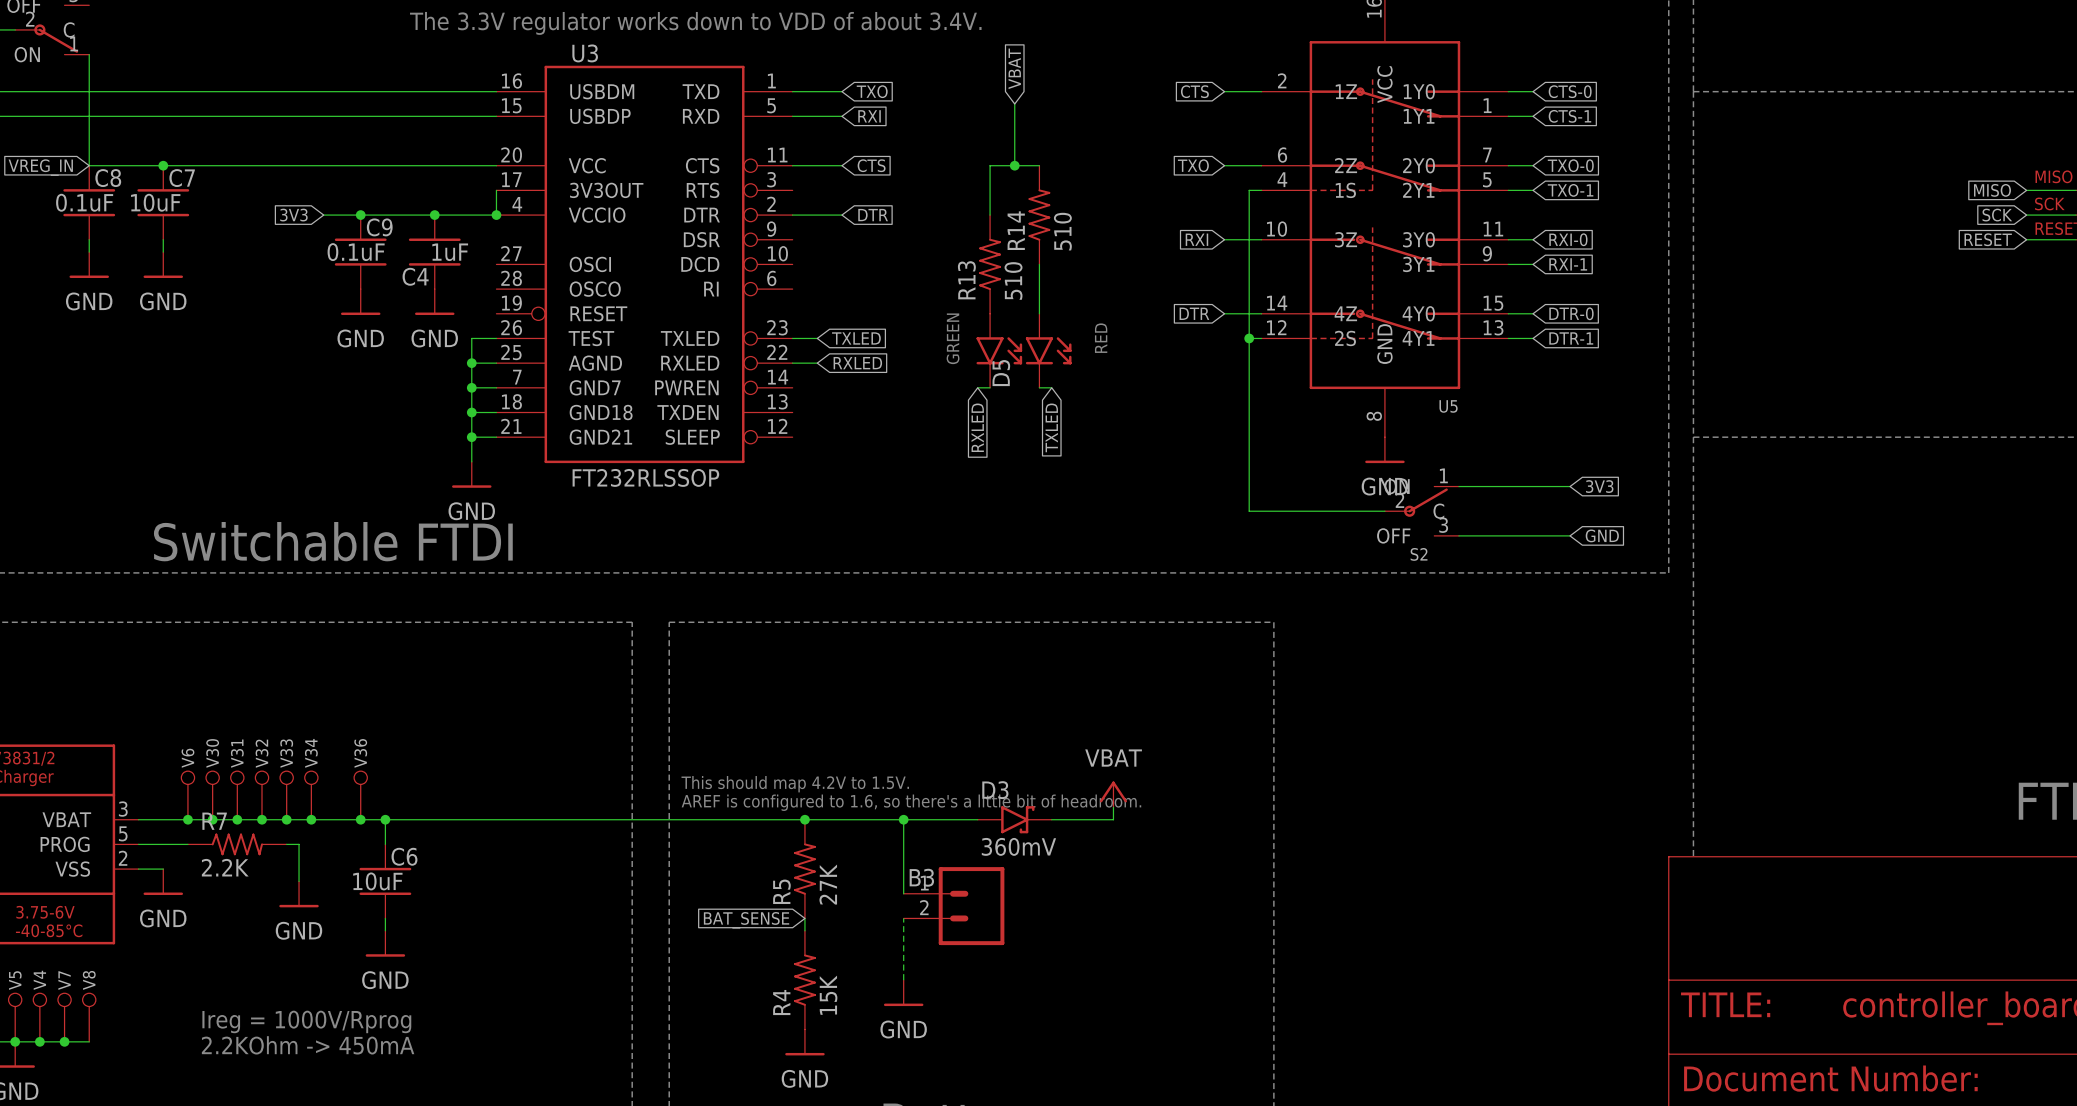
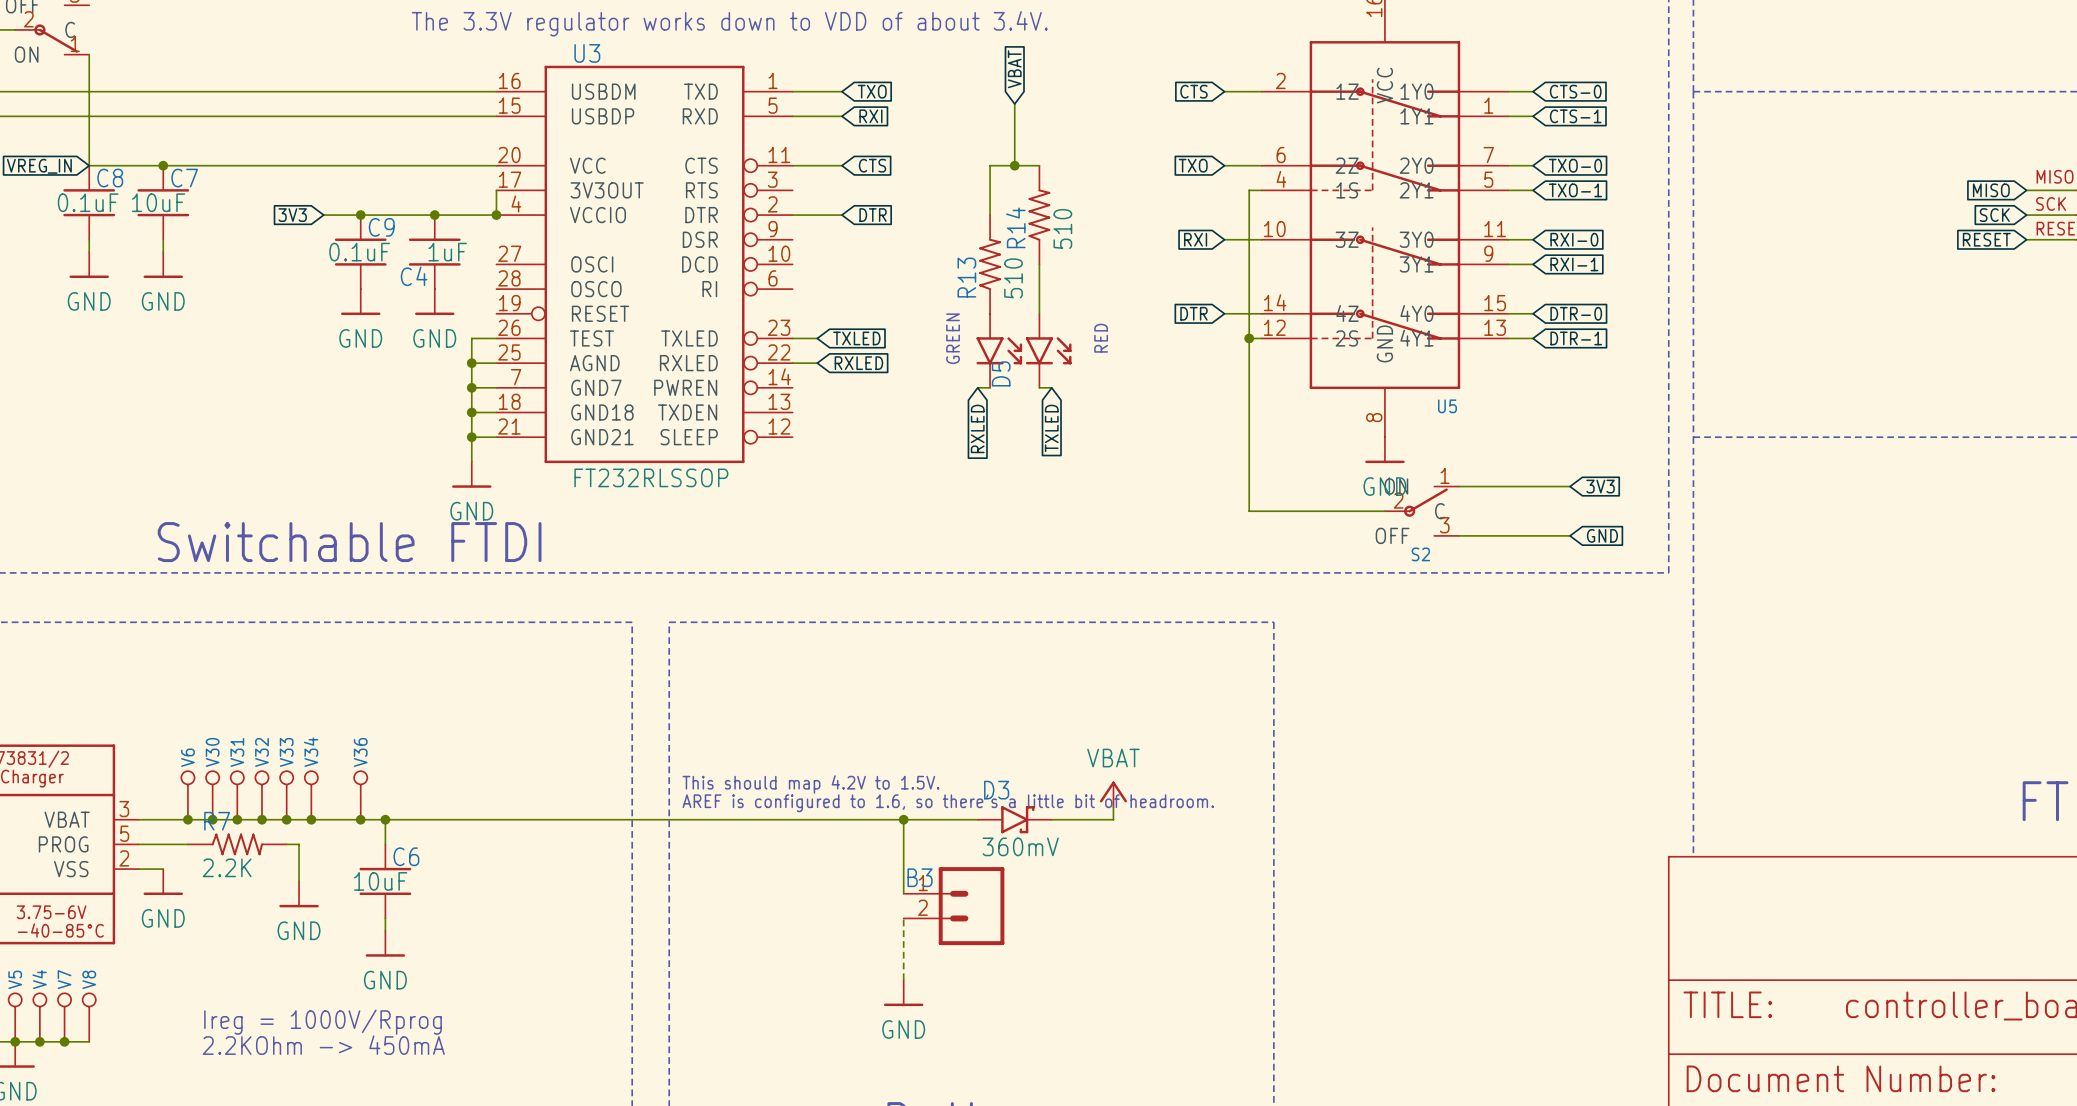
junction: (804, 819) -> none
R5: 27K (804, 869) -> none
wire: (804, 918) (804, 930) -> none
global label: BAT_SENSE (746, 920) -> none
R4: 15K (804, 980) -> none
power symbol: GND (804, 1042) -> none

